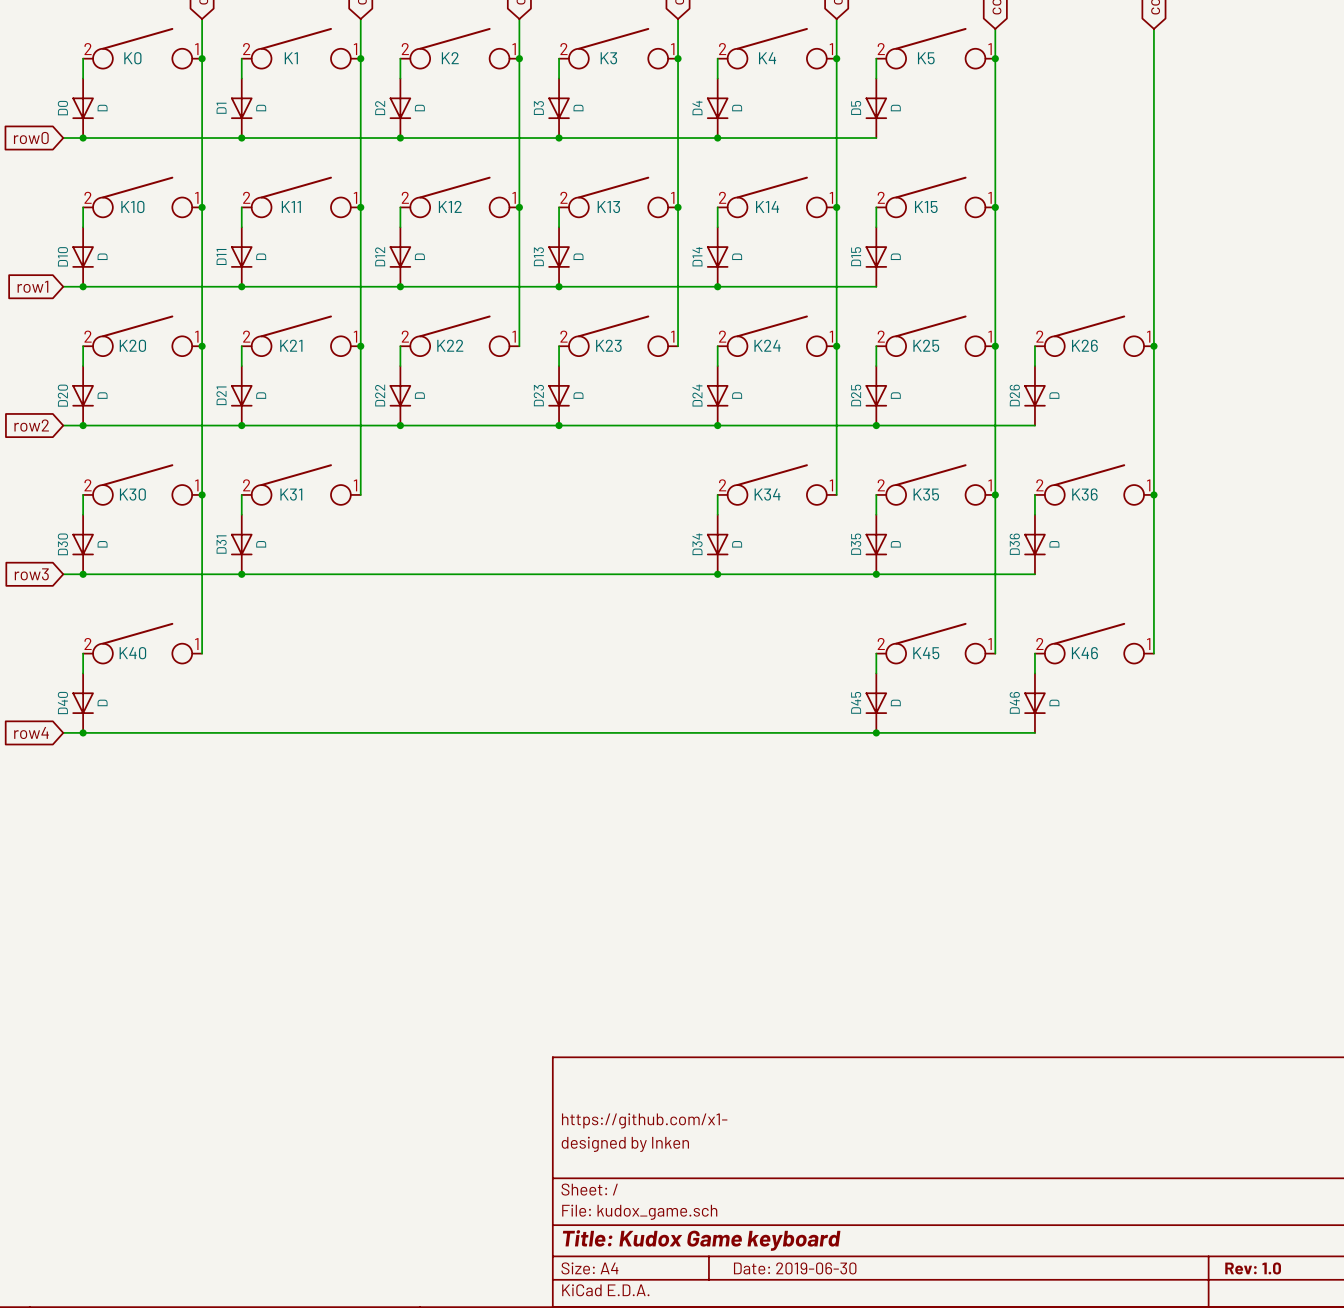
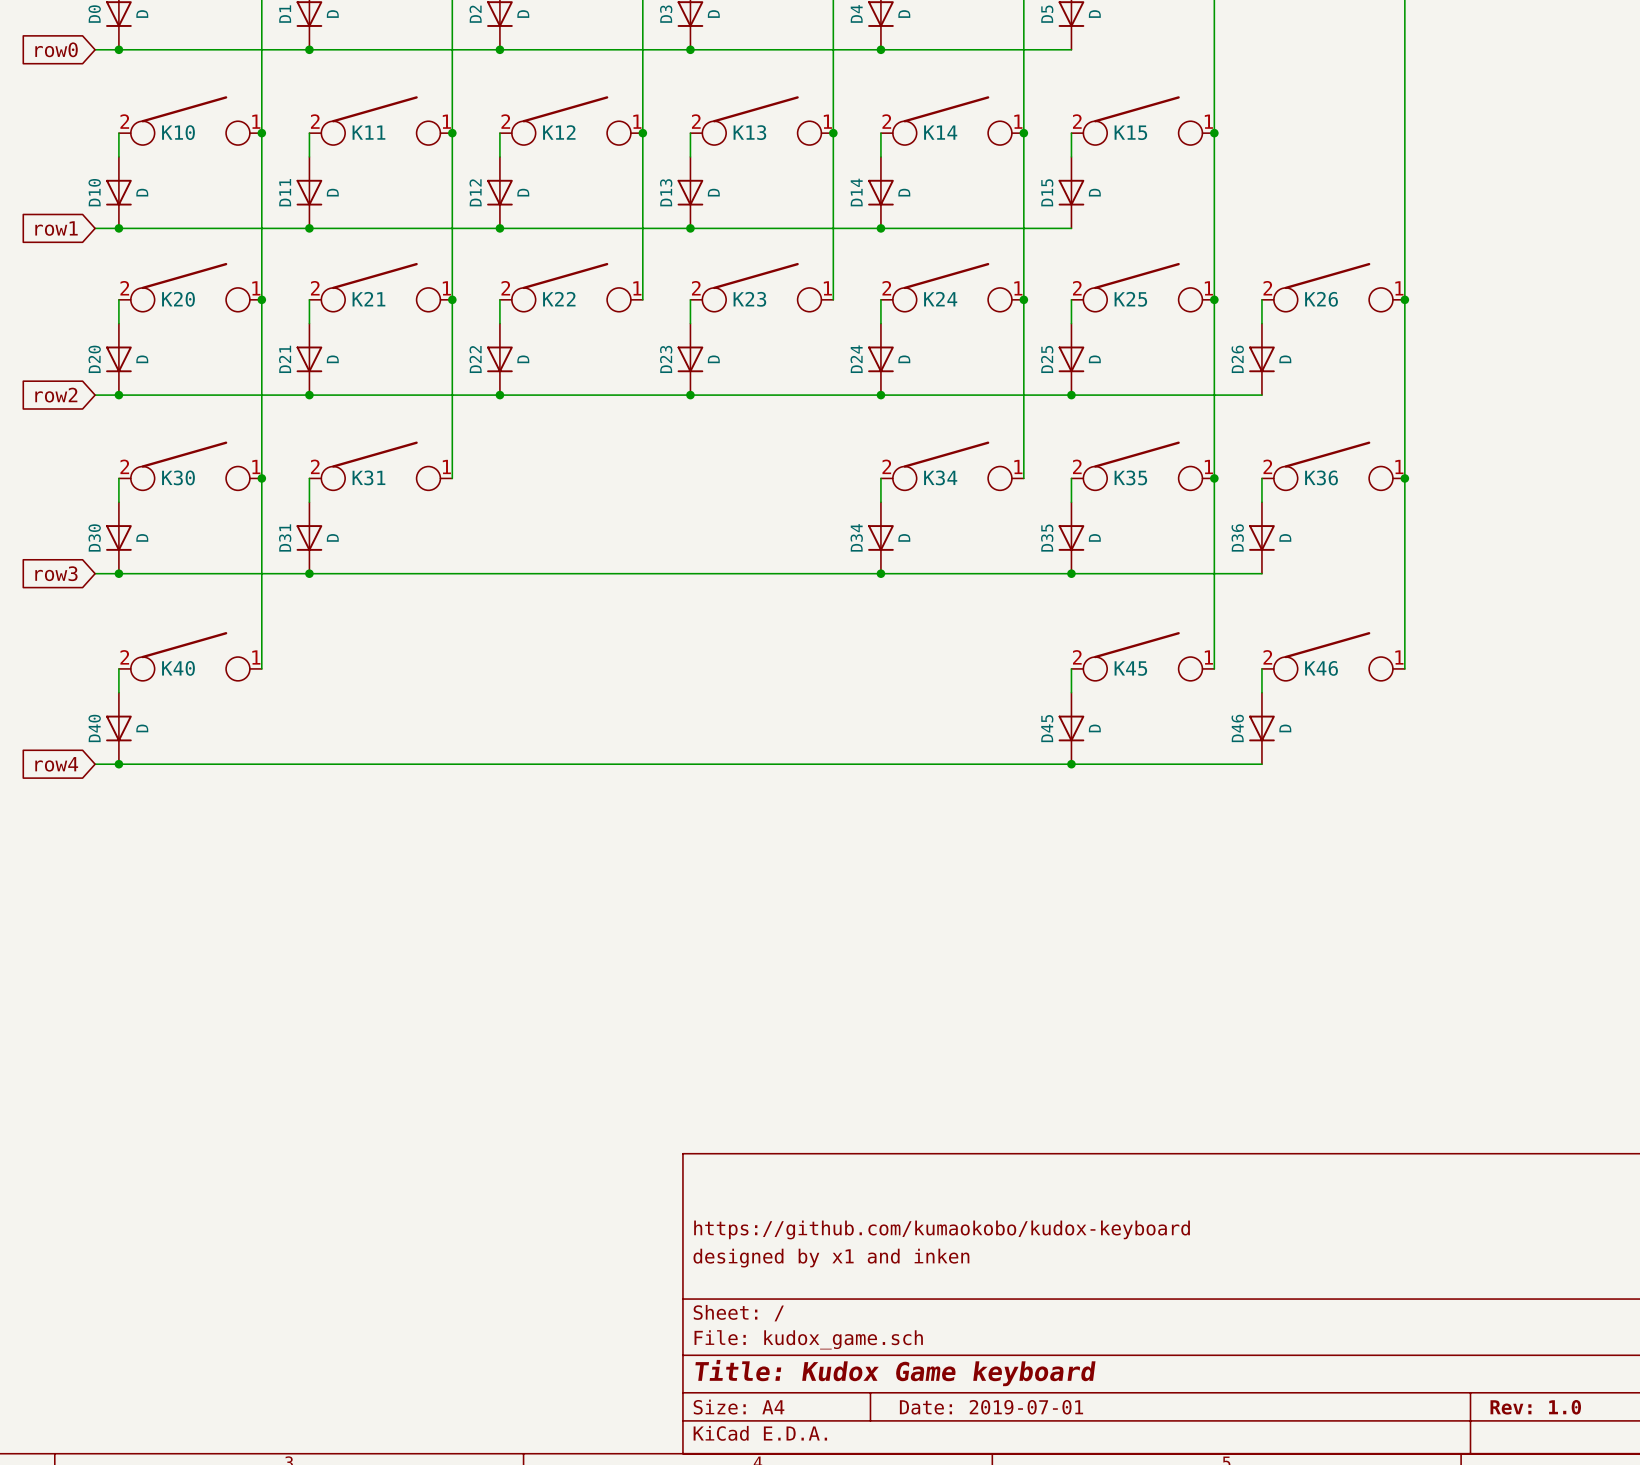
title block: https://github.com/x1- (644, 1120) -> https://github.com/kumaokobo/kudox-keyboard (942, 1229)
title block: designed by Inken (625, 1144) -> designed by x1 and inken (831, 1258)
title block: Date: 2019-06-30 (795, 1268) -> Date: 2019-07-01 (991, 1407)

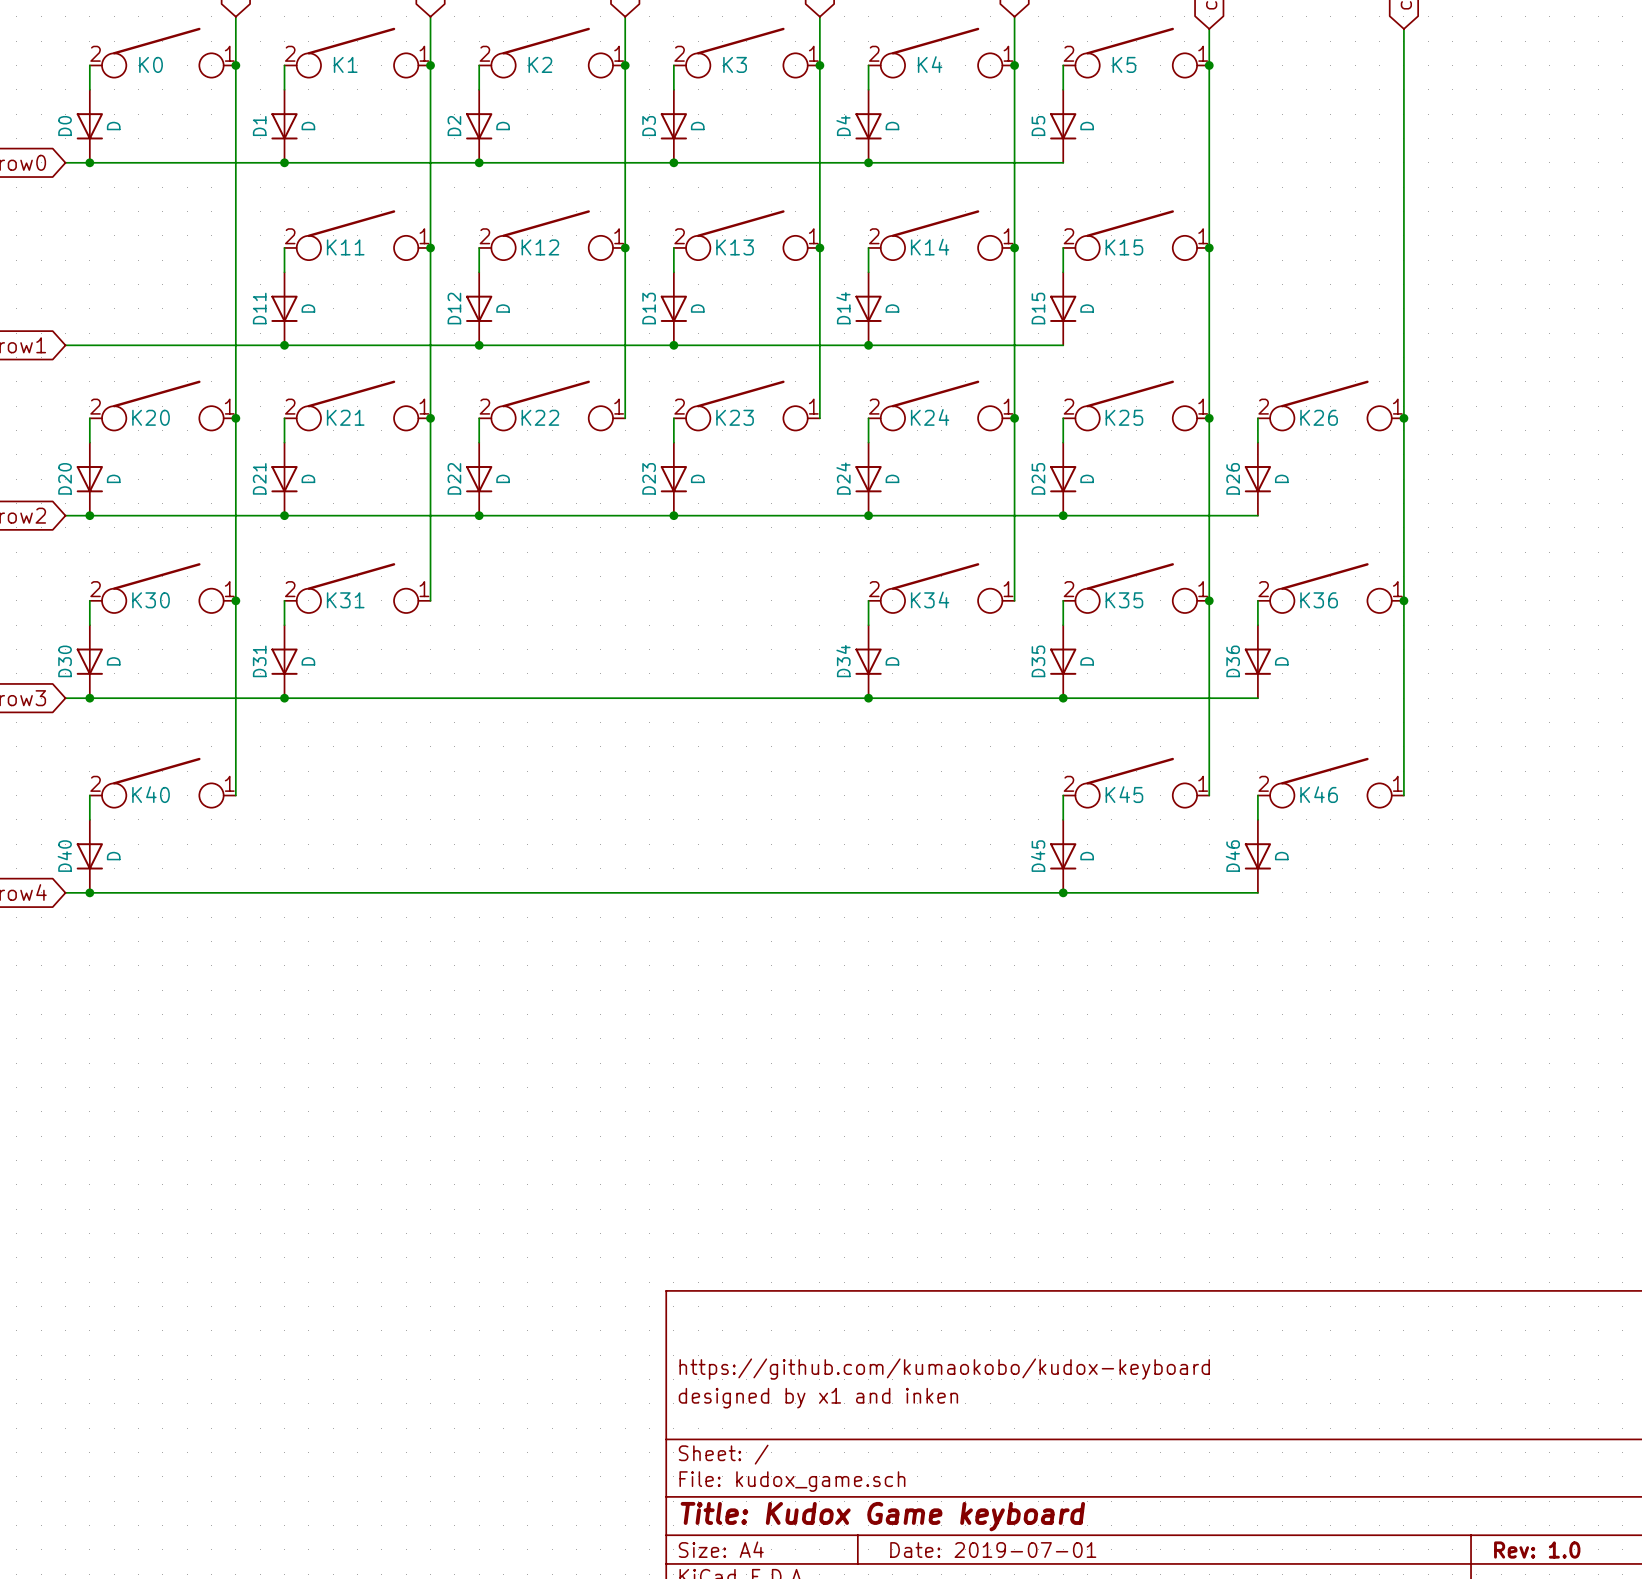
K10: (190, 120) -> none
wire: (118, 133) (118, 156) -> none
junction: (261, 133) -> none
D10: D (118, 192) -> none
junction: (118, 228) -> none

